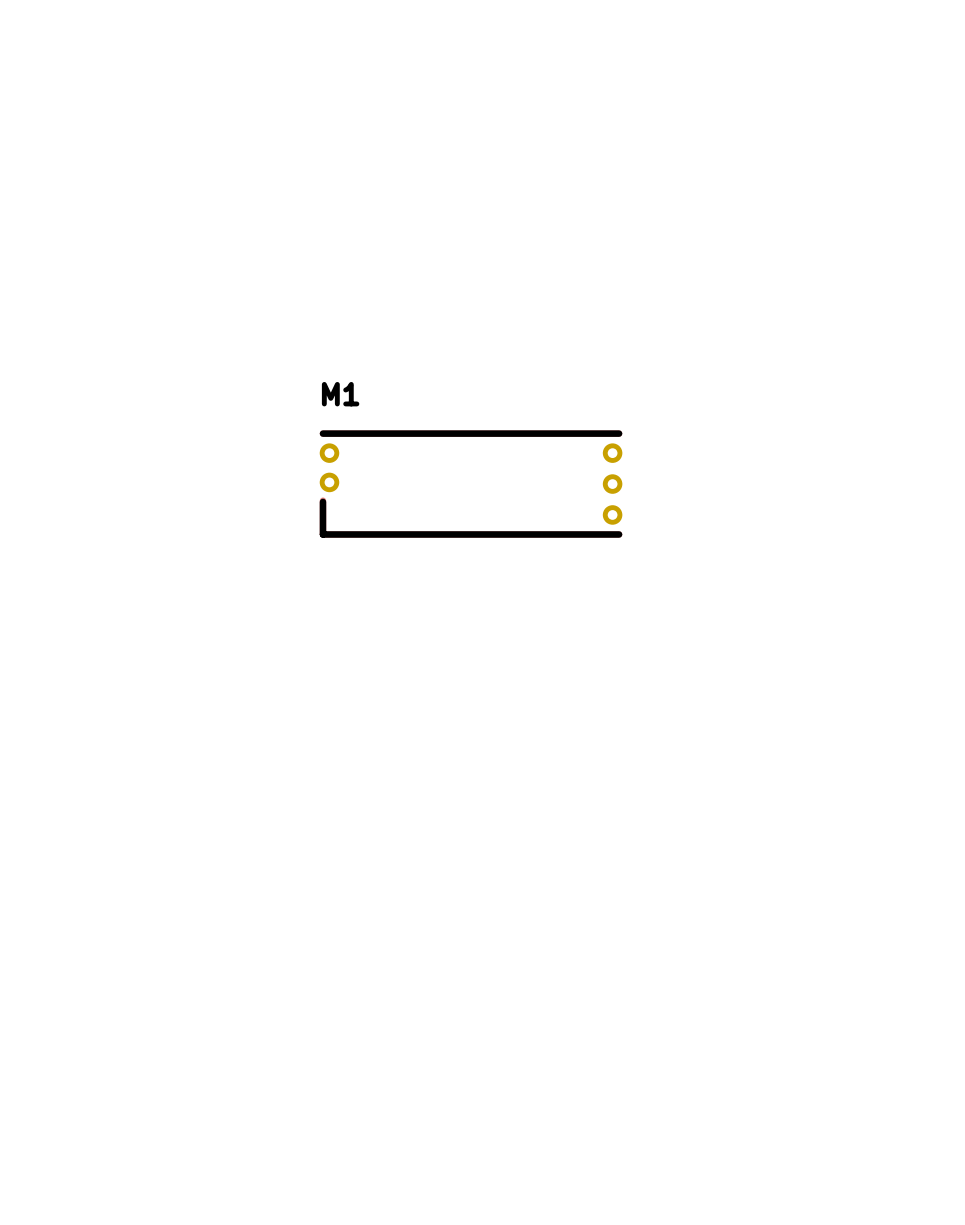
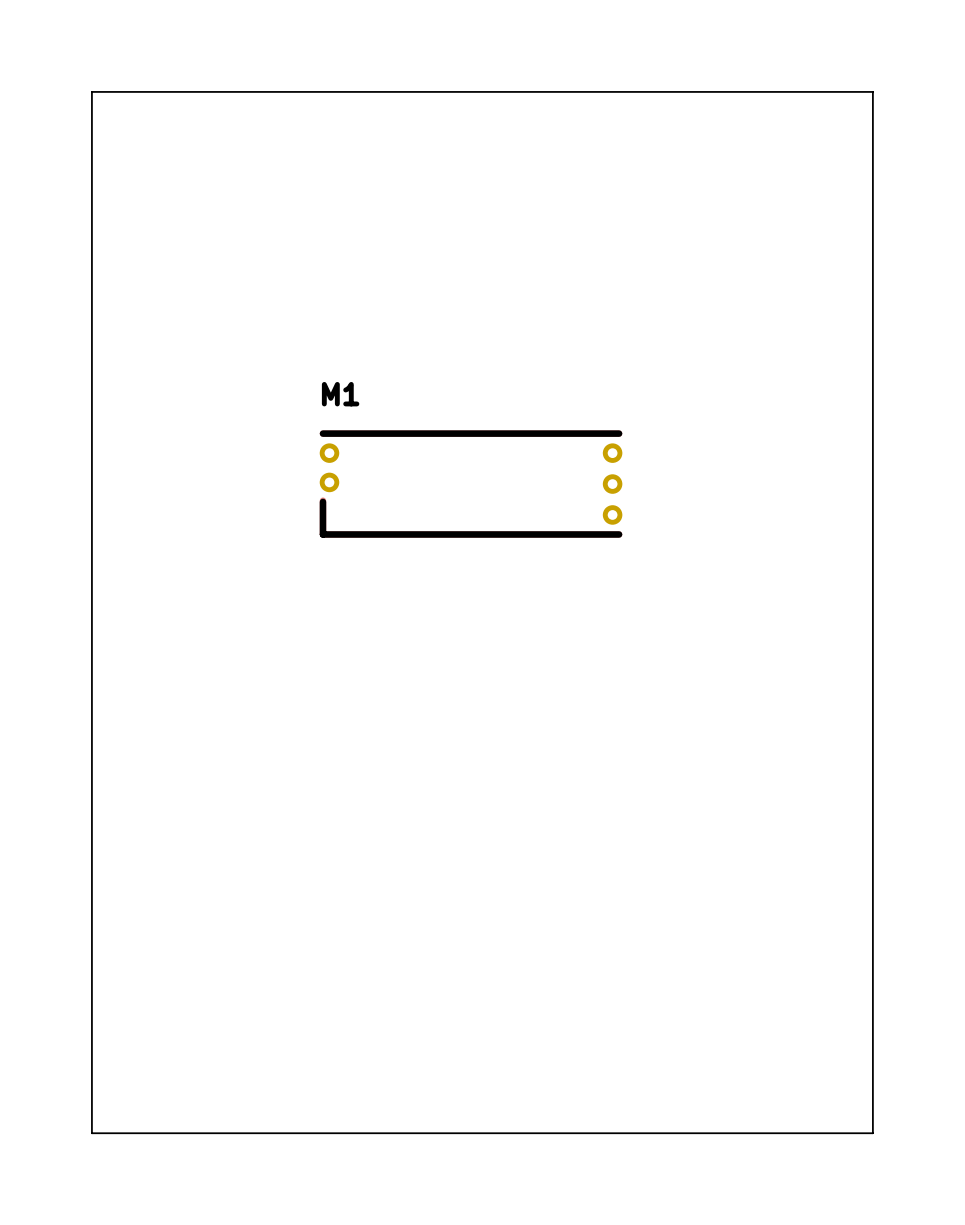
board edge: none -> (91, 91) (872, 91) (872, 1133) (91, 1133) (91, 91)

